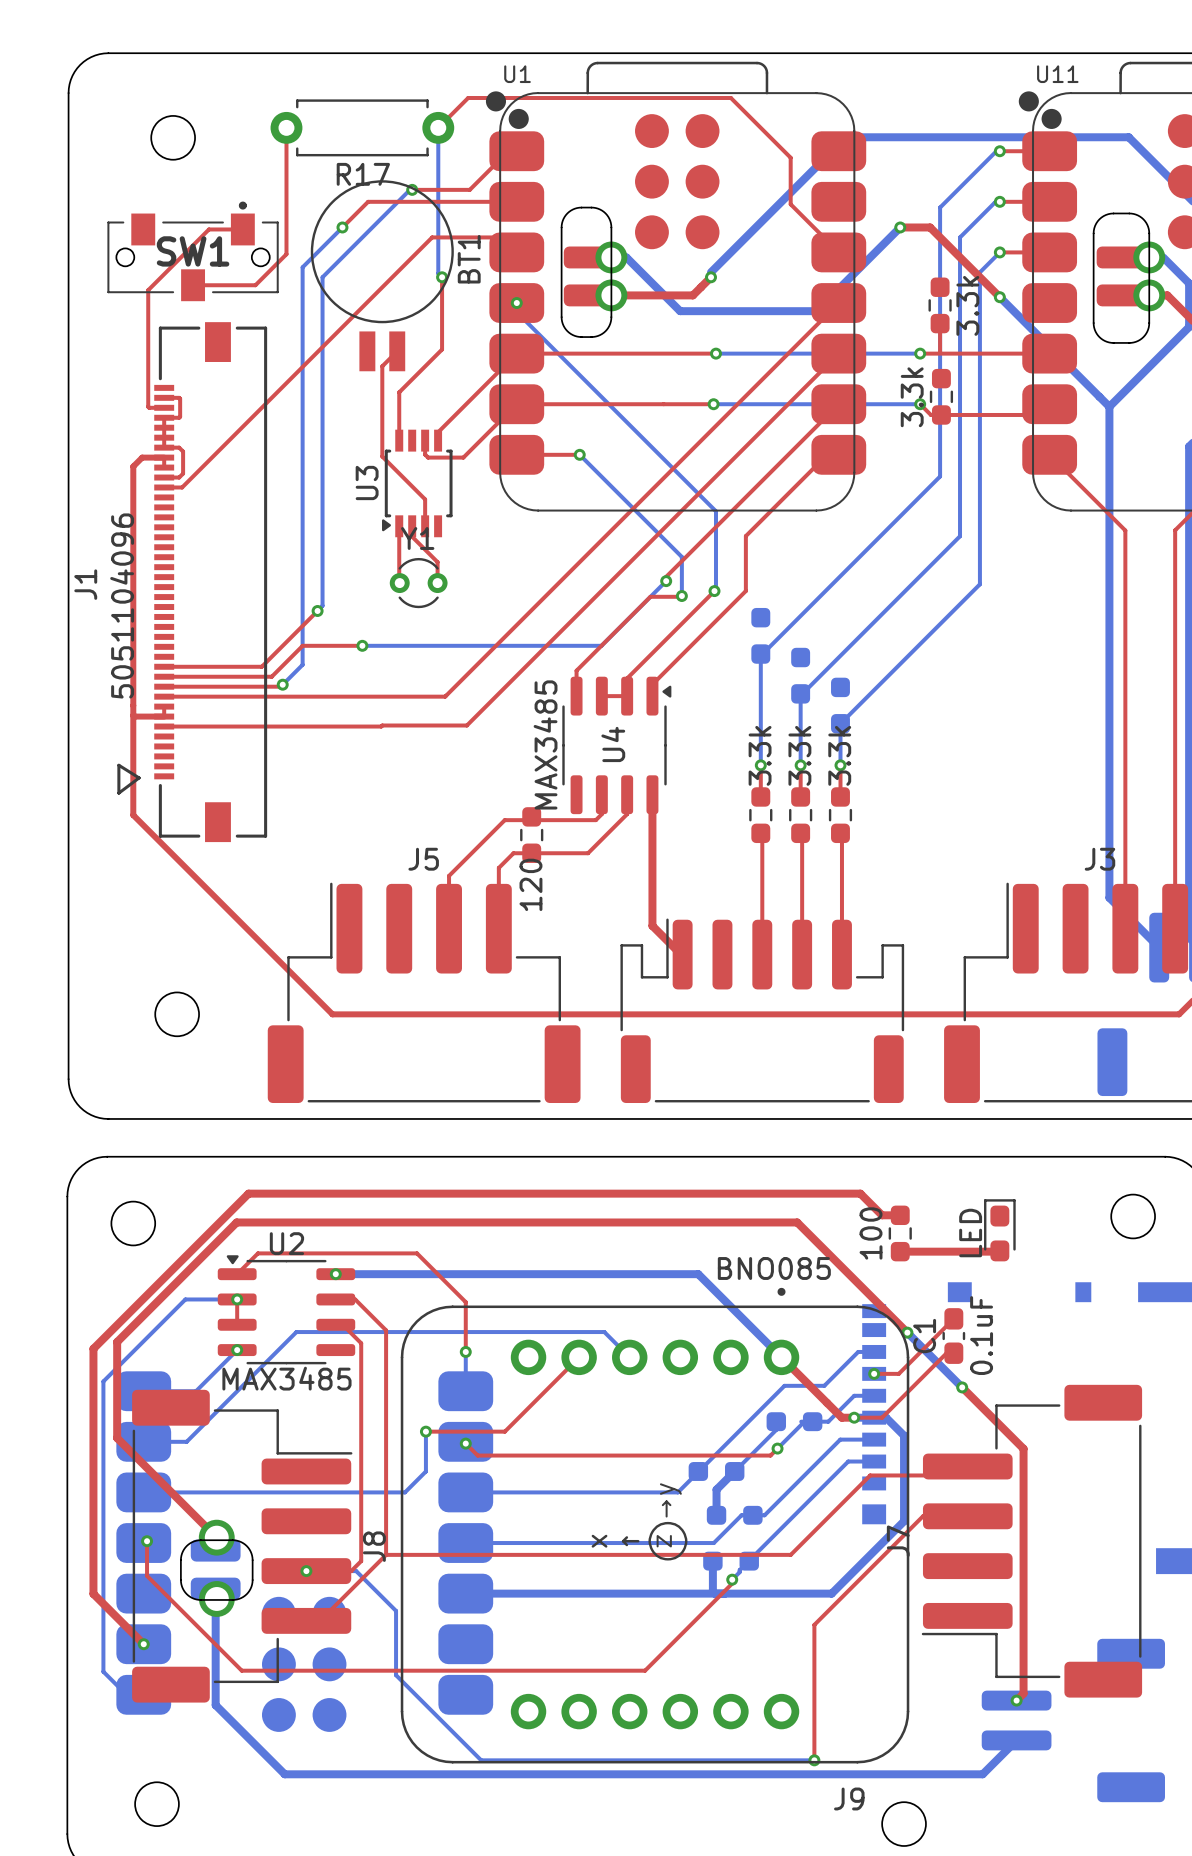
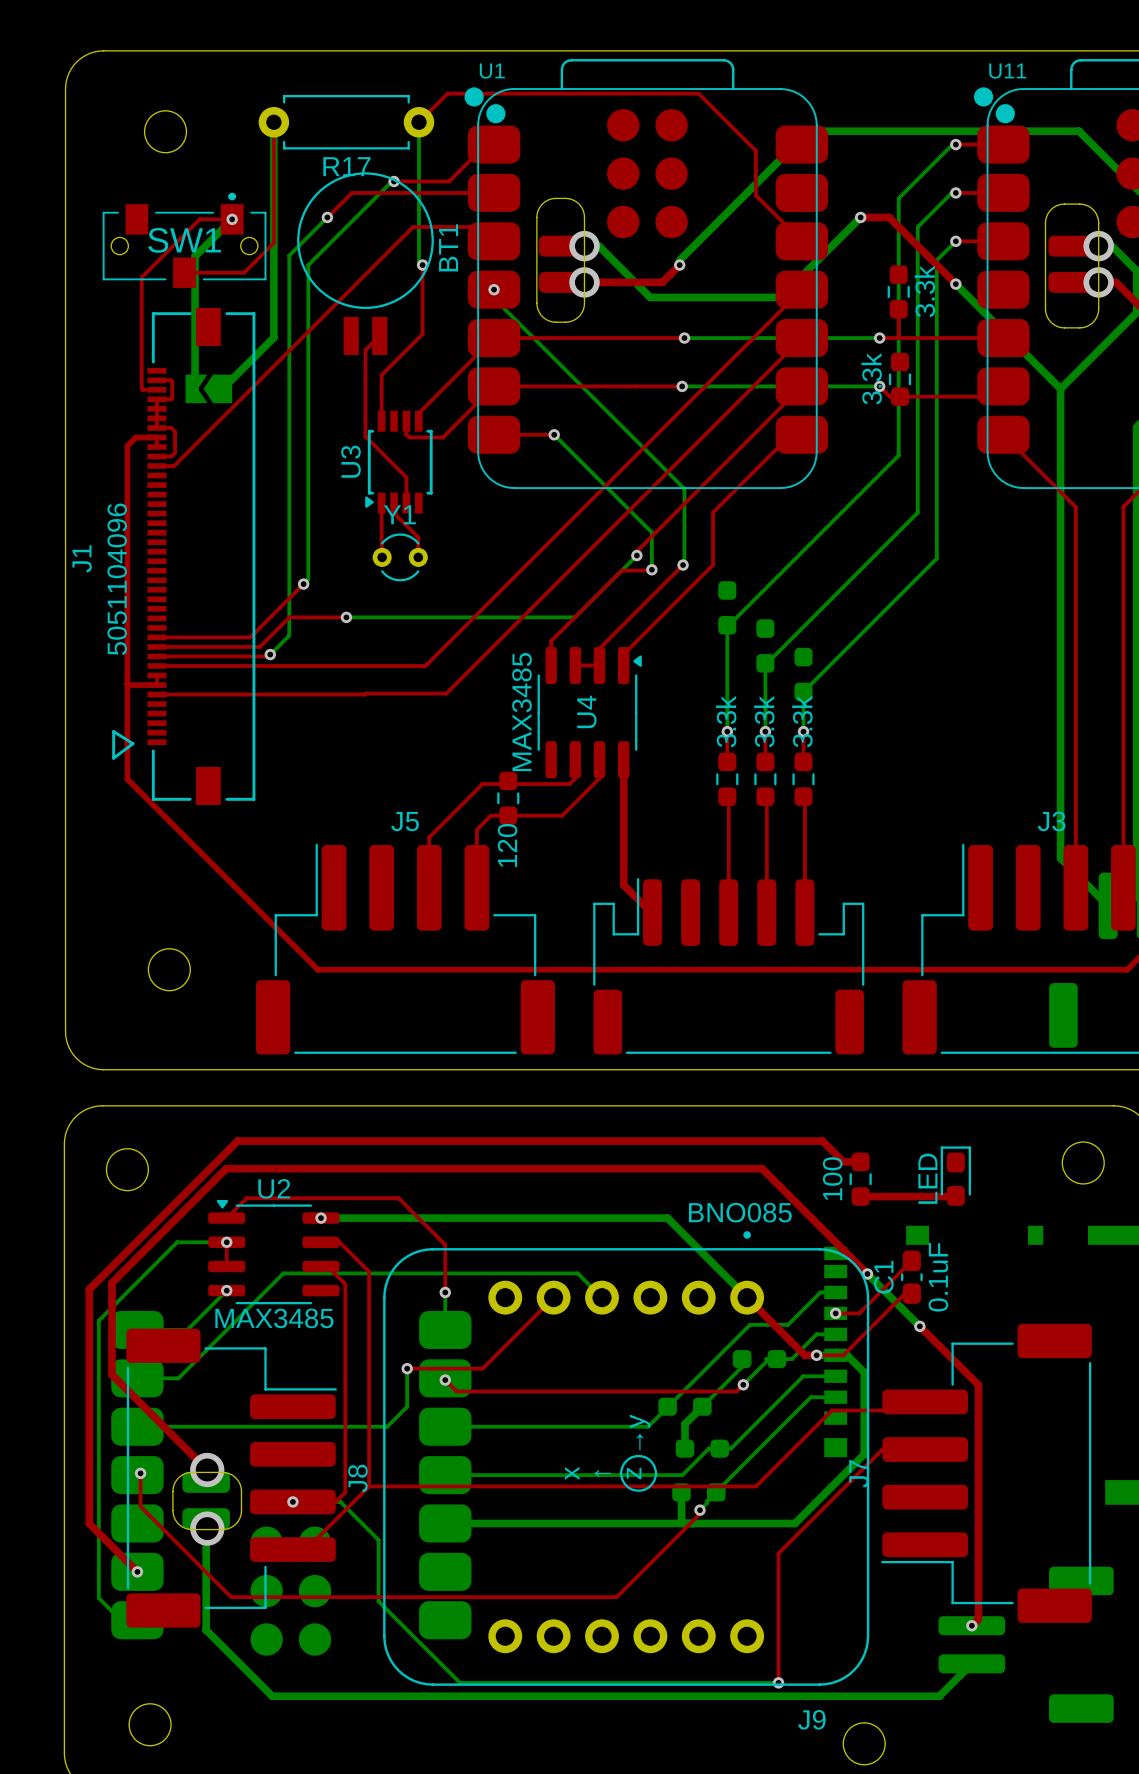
bottom track: none -> (273, 122) (273, 337) (222, 388)
bottom track: none -> (232, 219) (195, 256) (195, 388)
via: none -> (232, 219)
part: none -> (208, 388)

